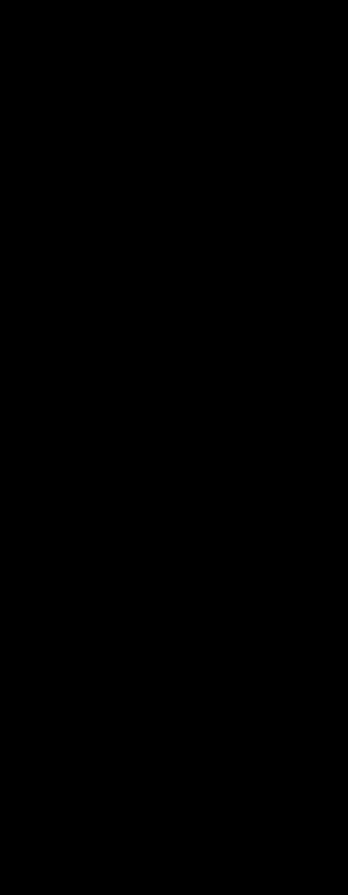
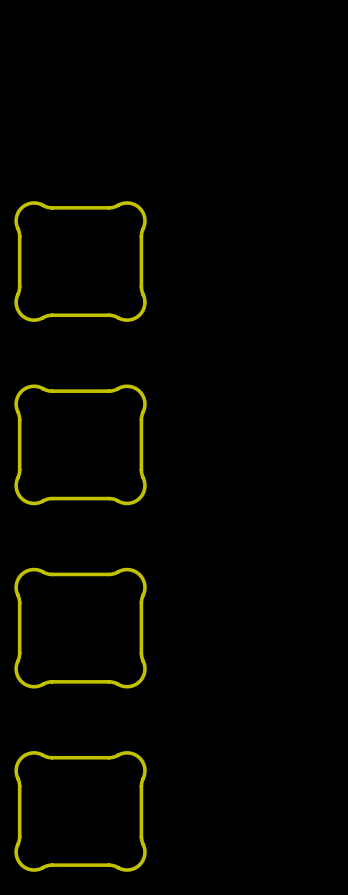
part: none -> (80, 261)
part: none -> (80, 444)
part: none -> (80, 628)
part: none -> (80, 811)

